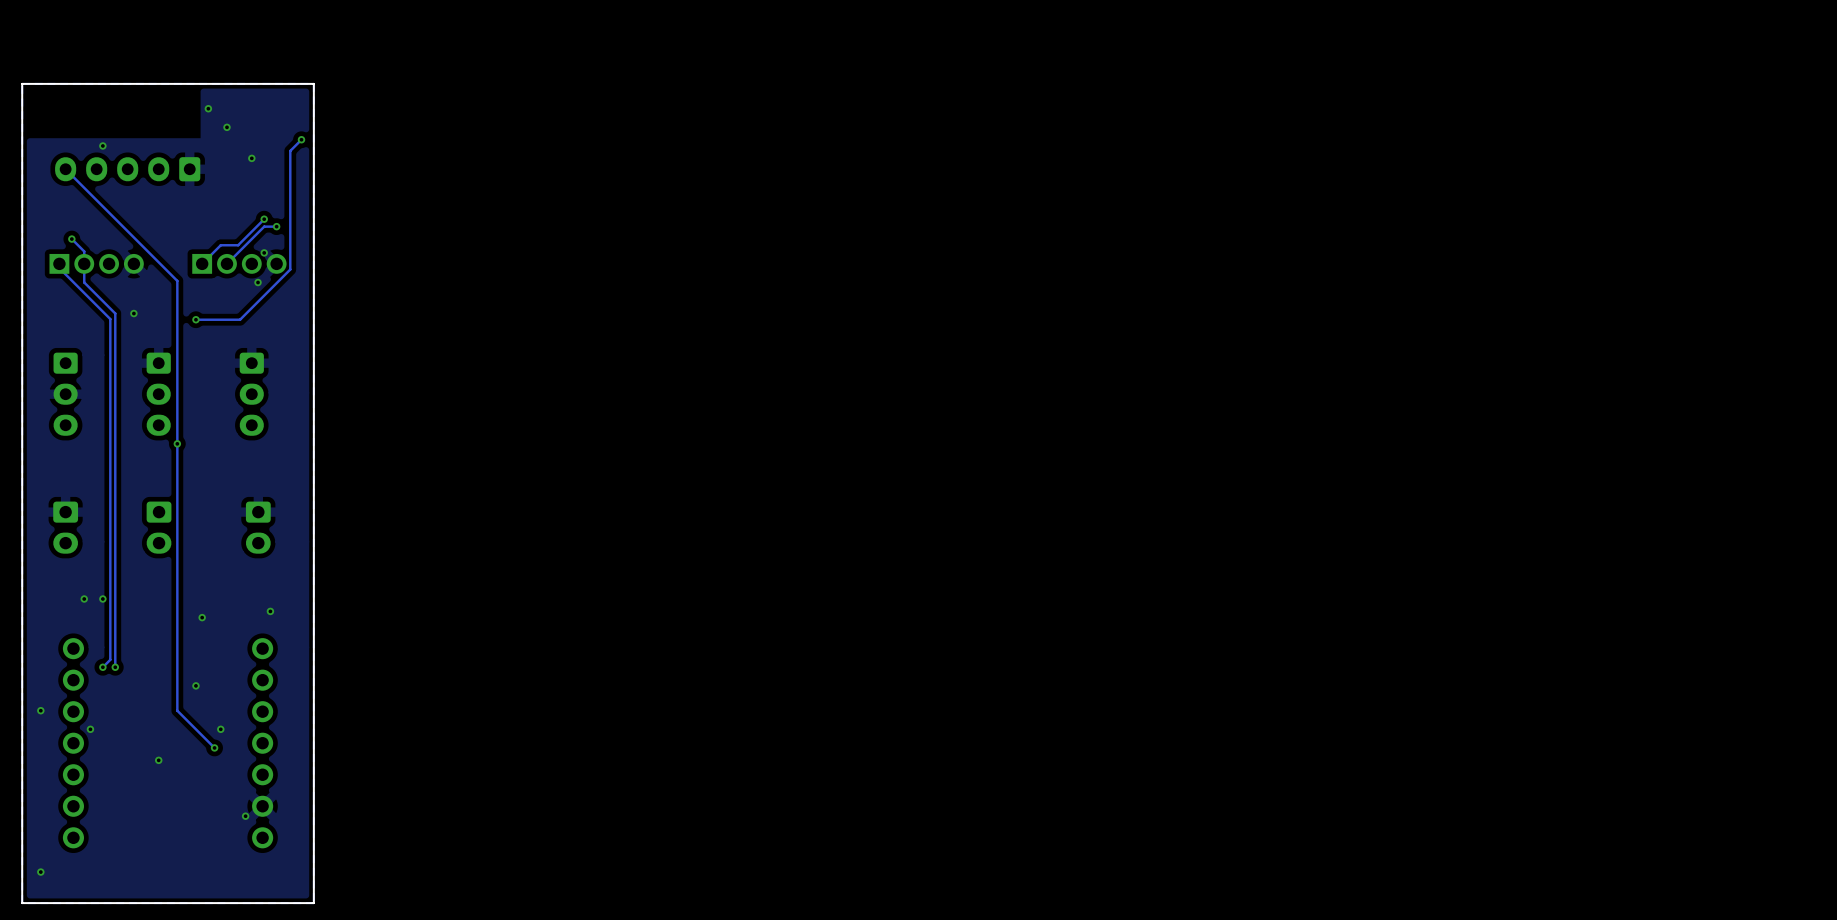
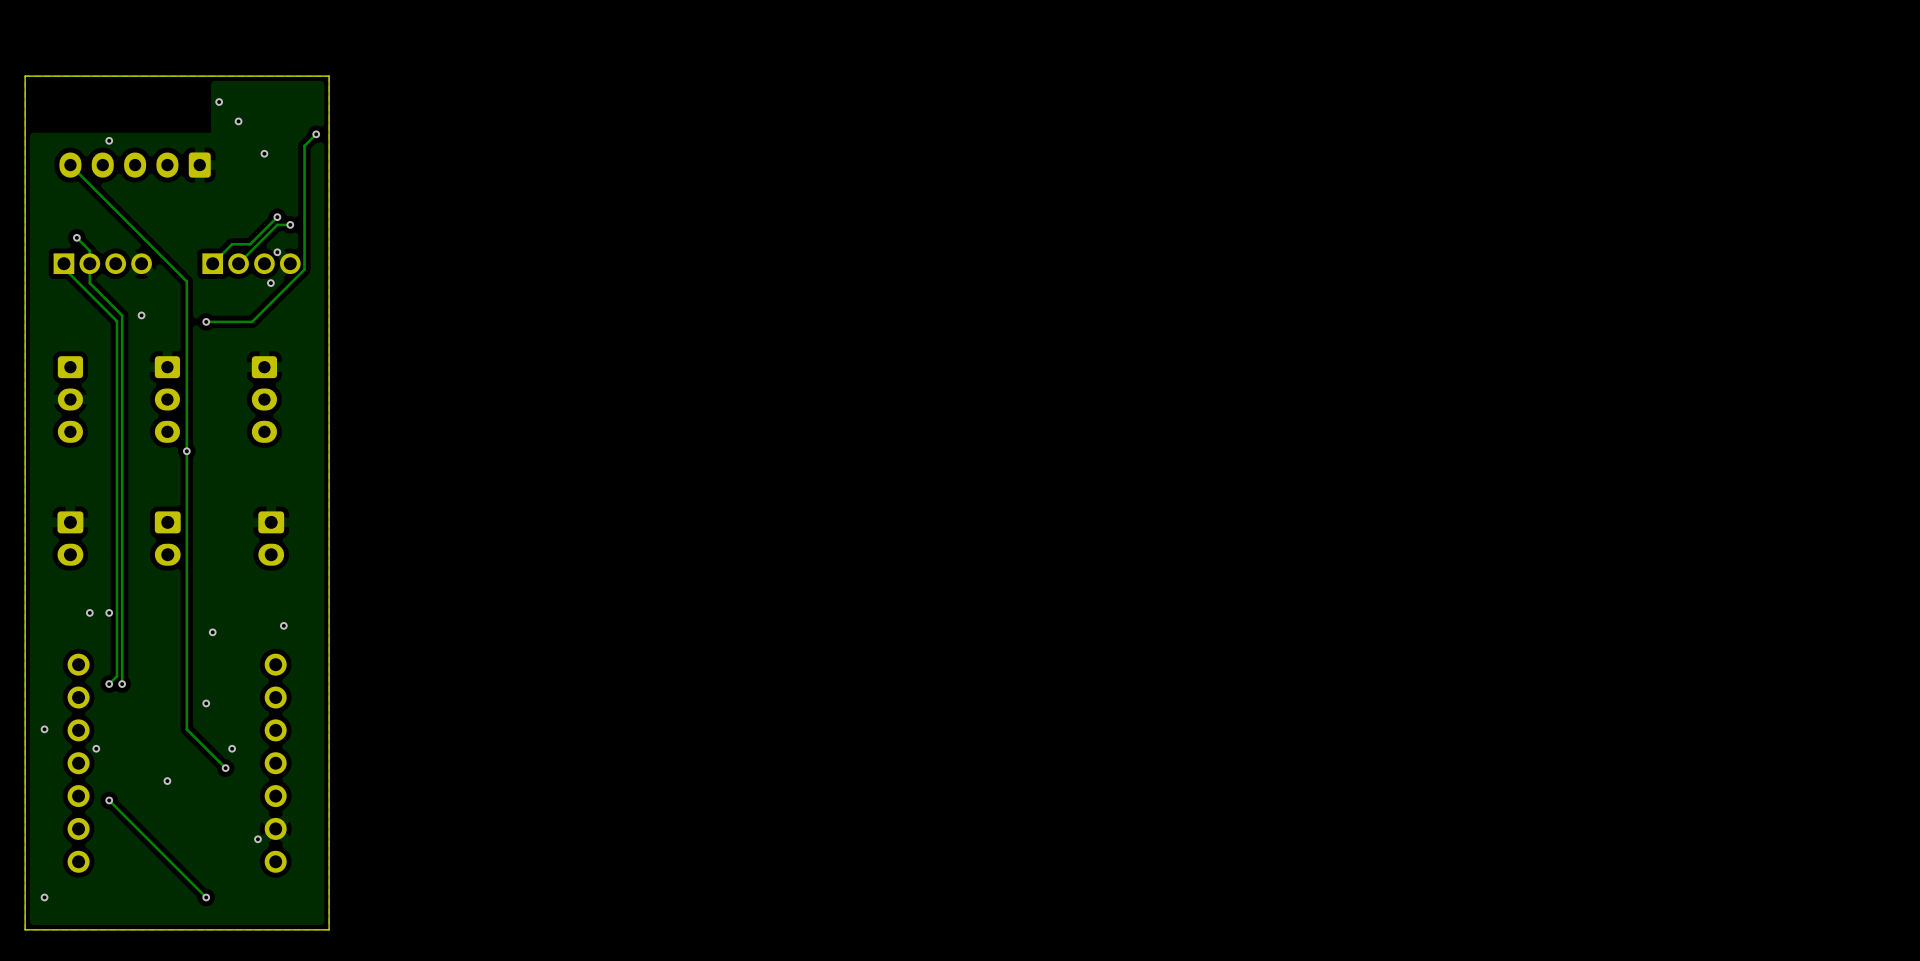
track: none -> (109, 800) (206, 897)
via: none -> (109, 800)
via: none -> (206, 897)

